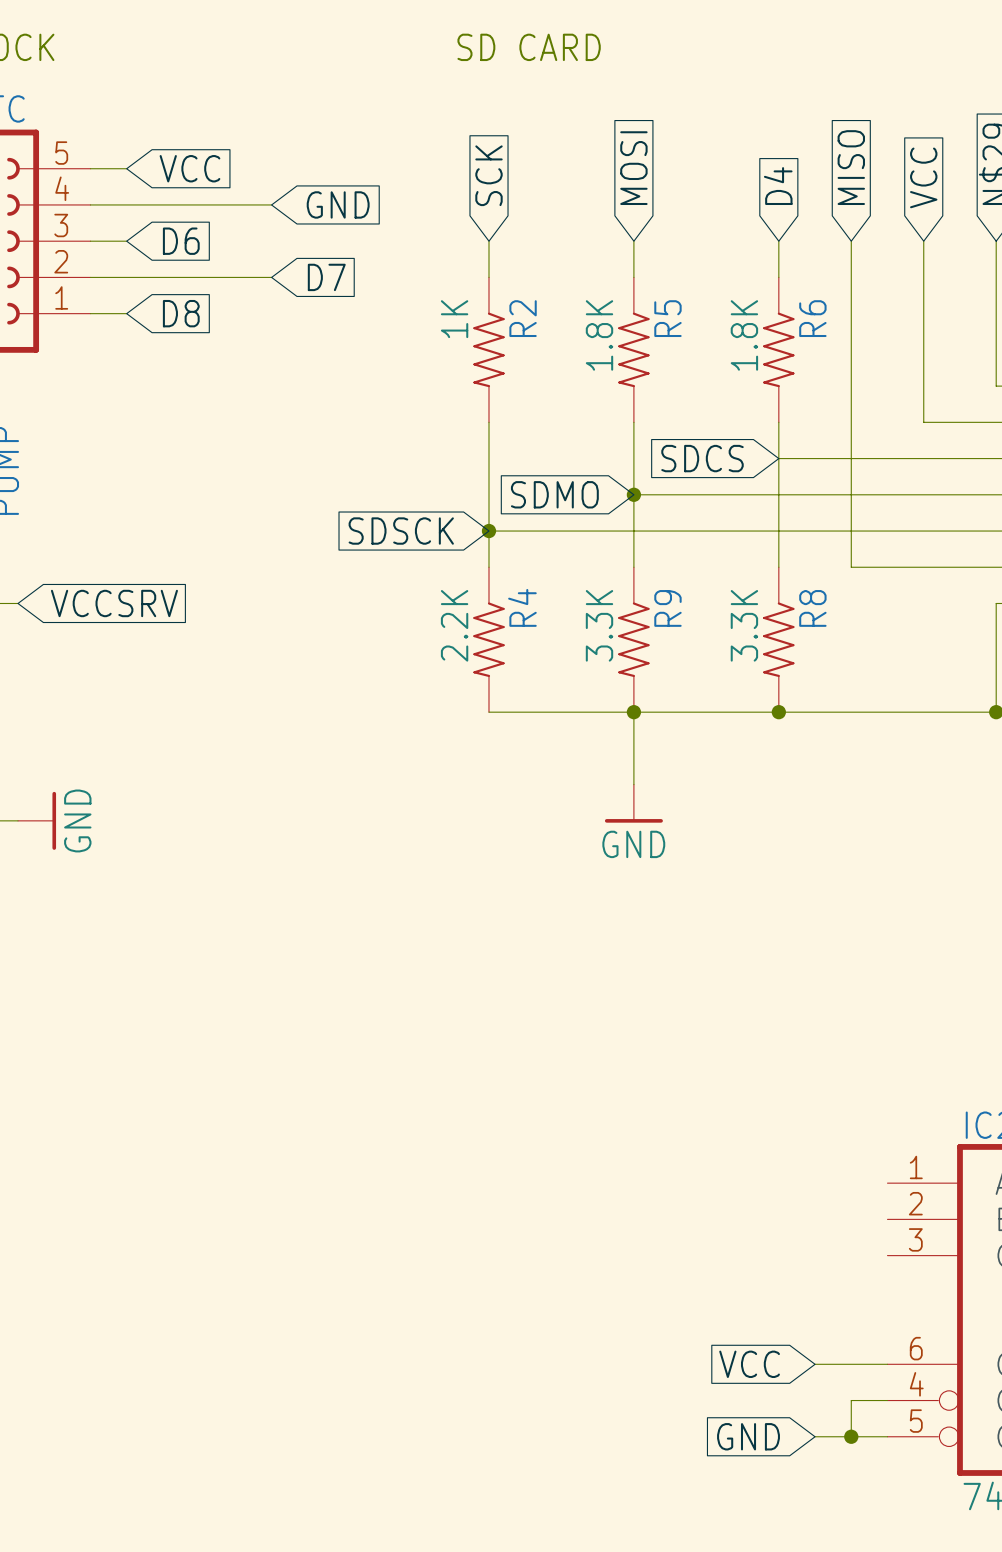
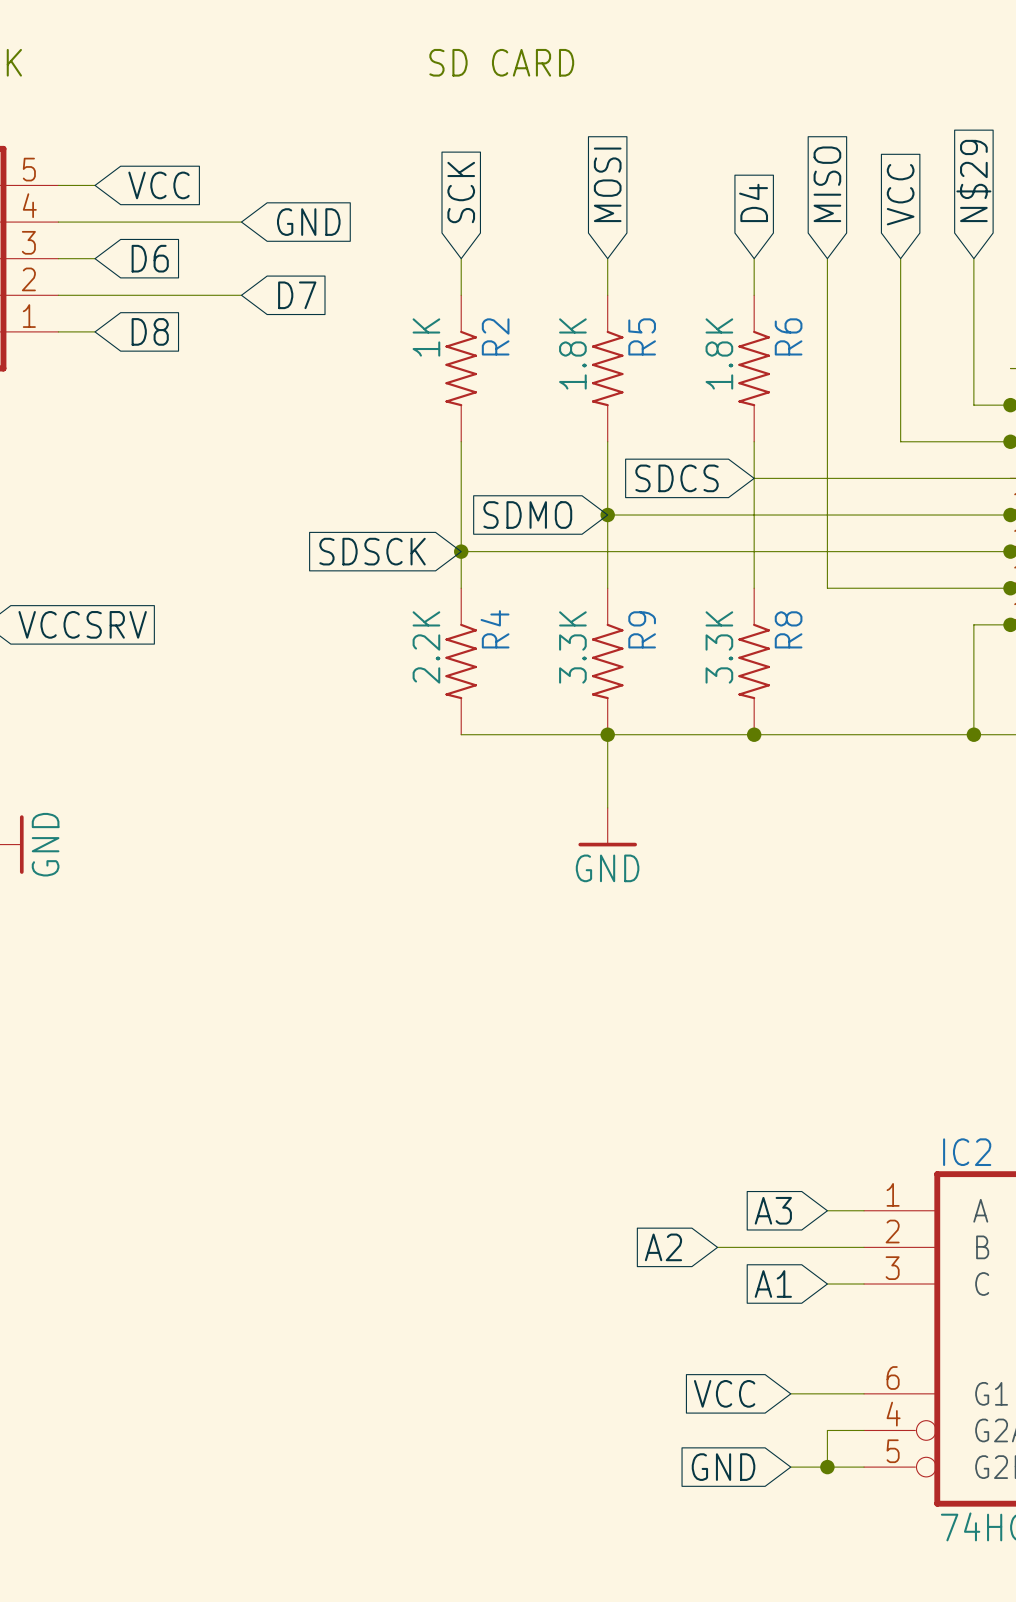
global label: none -> A3 (773, 1210)
wire: none -> (827, 1210) (864, 1210)
global label: none -> A2 (663, 1247)
wire: none -> (717, 1247) (864, 1247)
global label: none -> A1 (773, 1284)
wire: none -> (827, 1284) (864, 1284)

